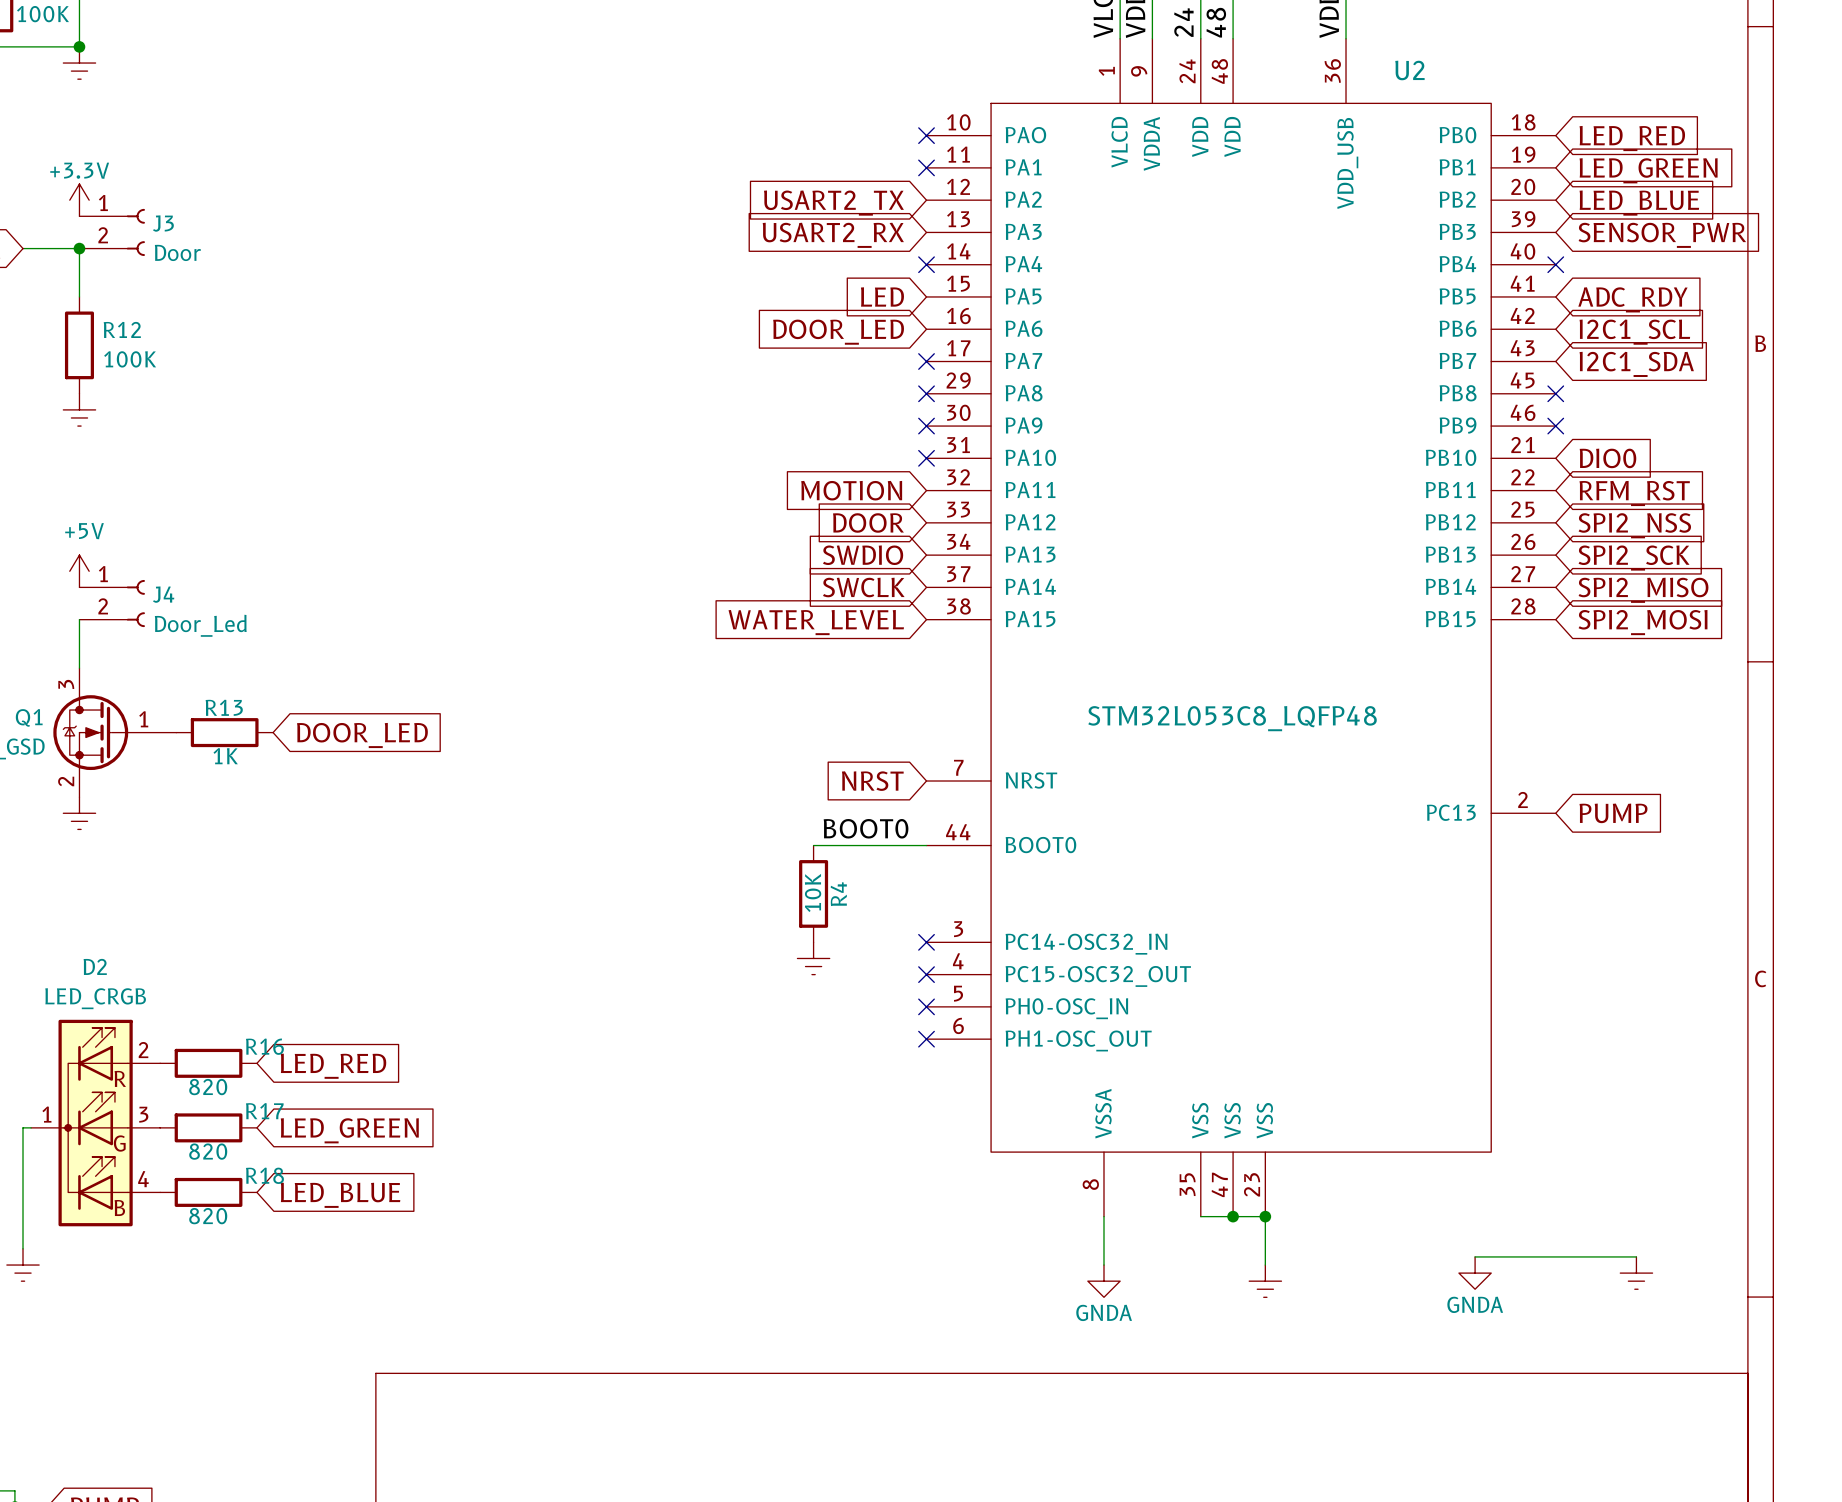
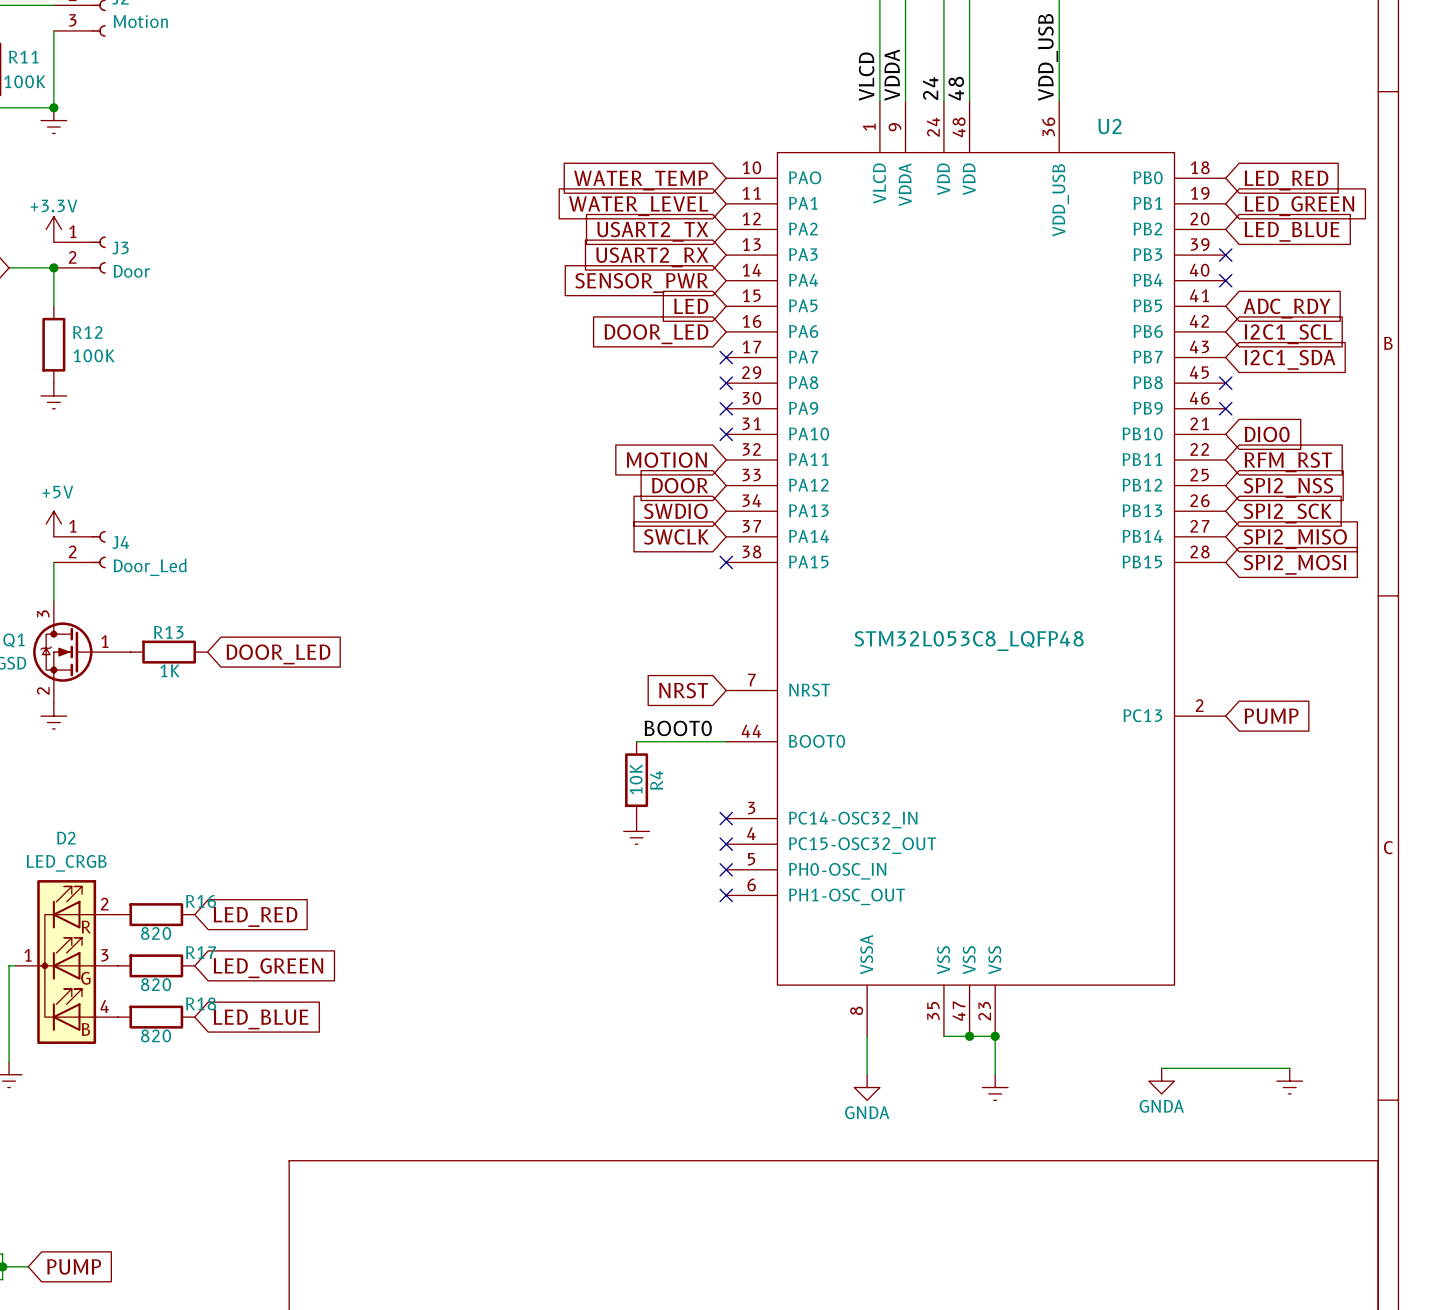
no-connect mark: (926, 135) -> none
global label: none -> WATER_TEMP (640, 180)
no-connect mark: (926, 167) -> none
global label: none -> WATER_LEVEL (638, 206)
no-connect mark: none -> (1225, 255)
global label: SENSOR_PWR (1662, 235) -> none
no-connect mark: (926, 264) -> none
global label: none -> SENSOR_PWR (641, 282)
no-connect mark: none -> (726, 562)
global label: WATER_LEVEL (816, 622) -> none

